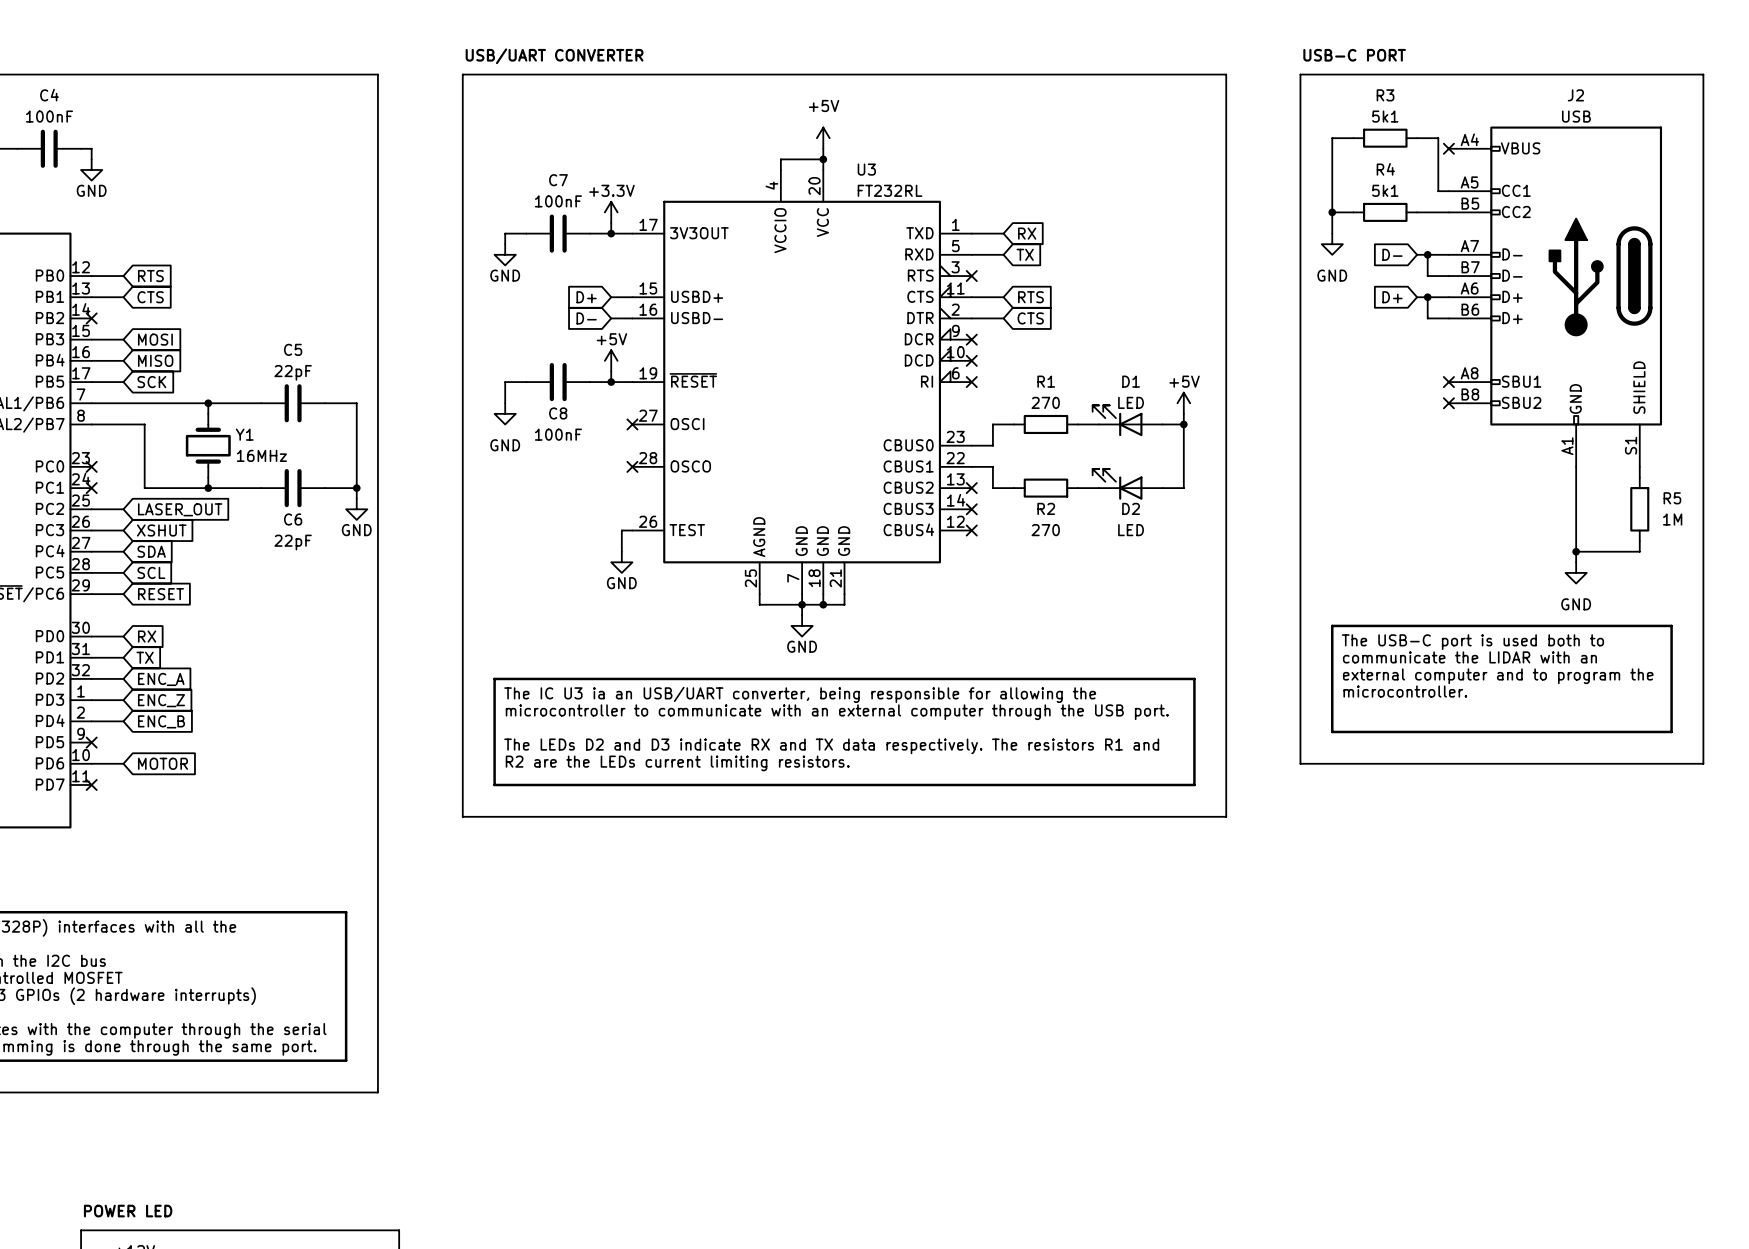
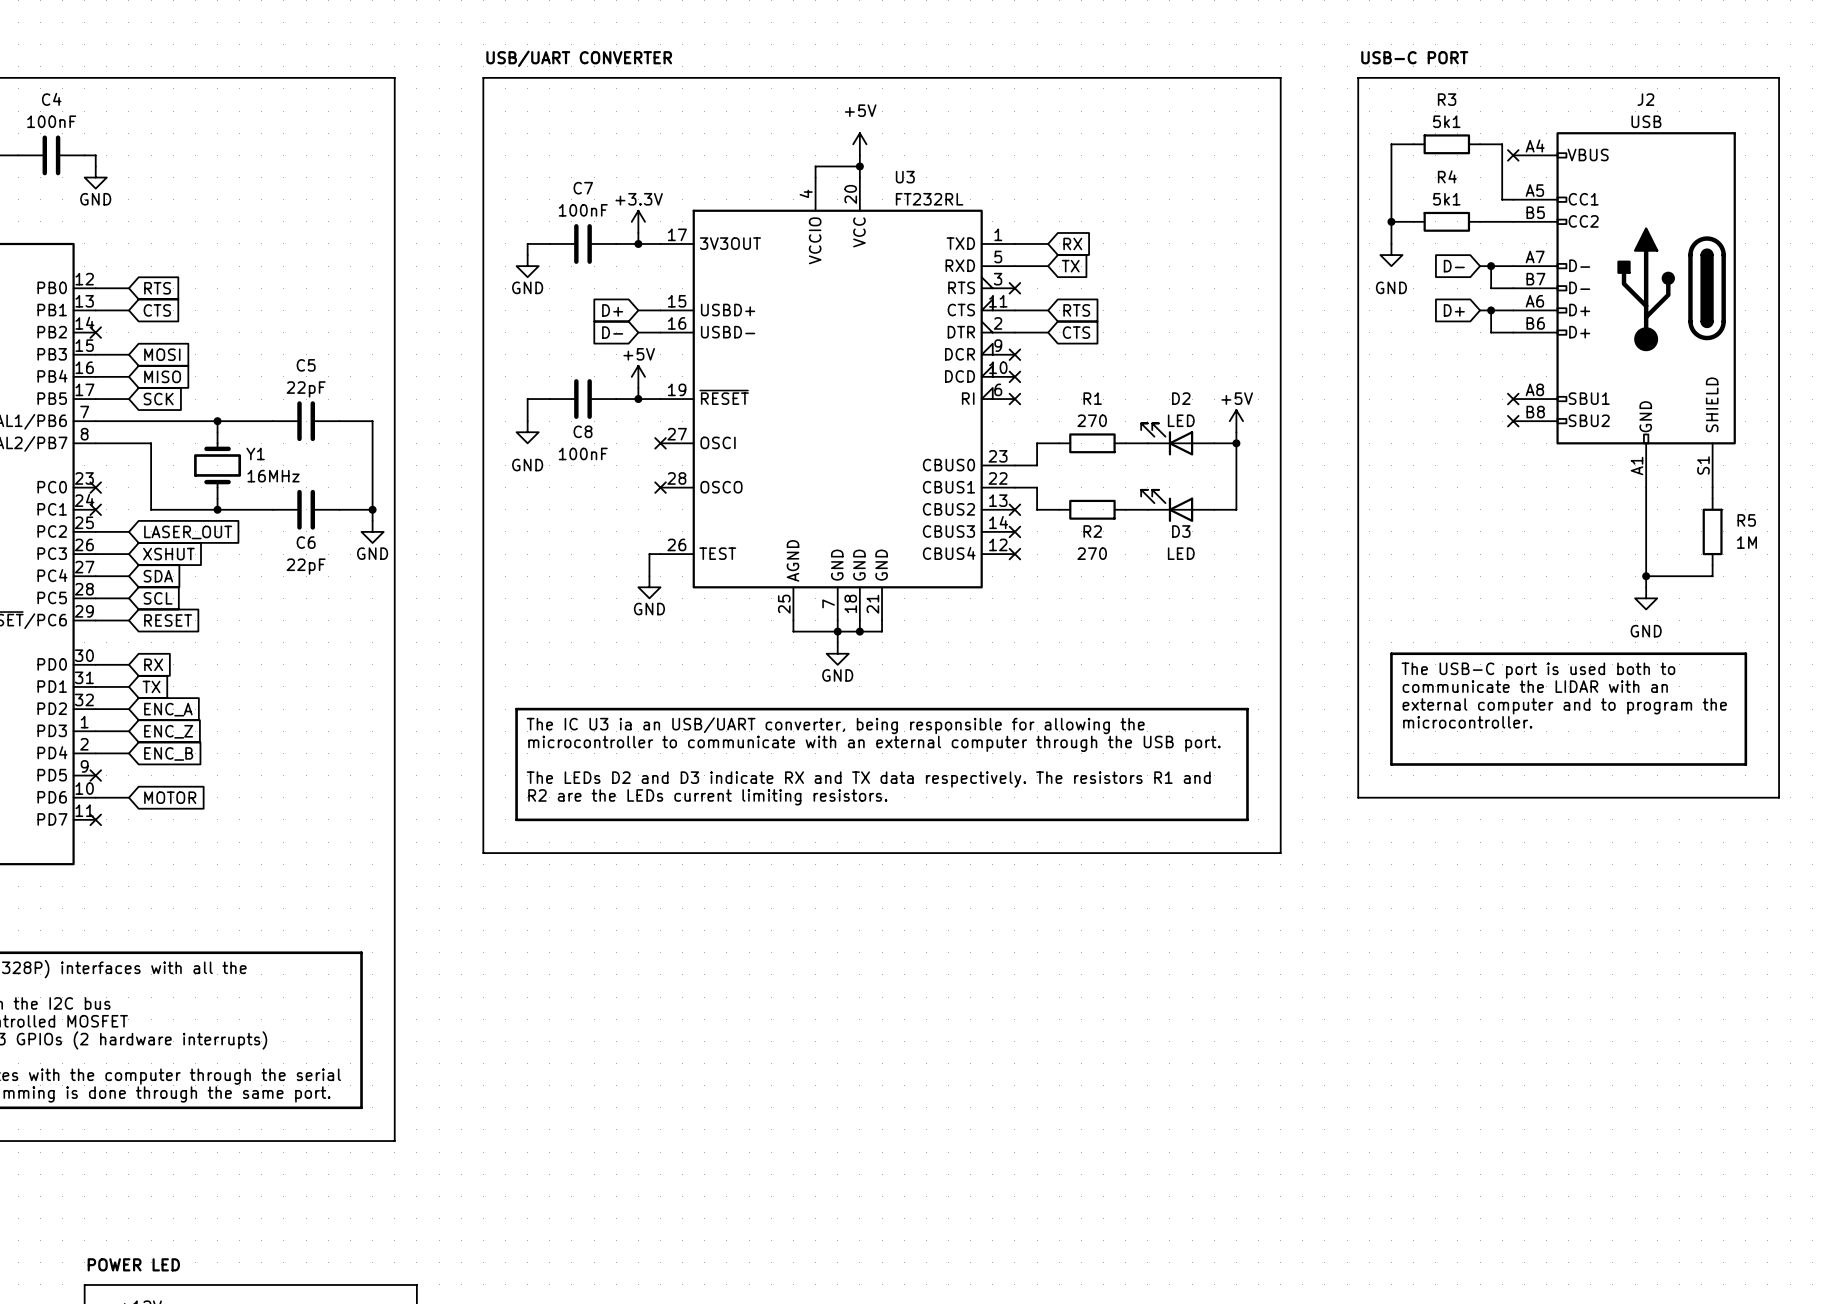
D1 name: D1 (1131, 381) -> D2 (1181, 398)
D2 name: D2 (1131, 508) -> D3 (1181, 531)

